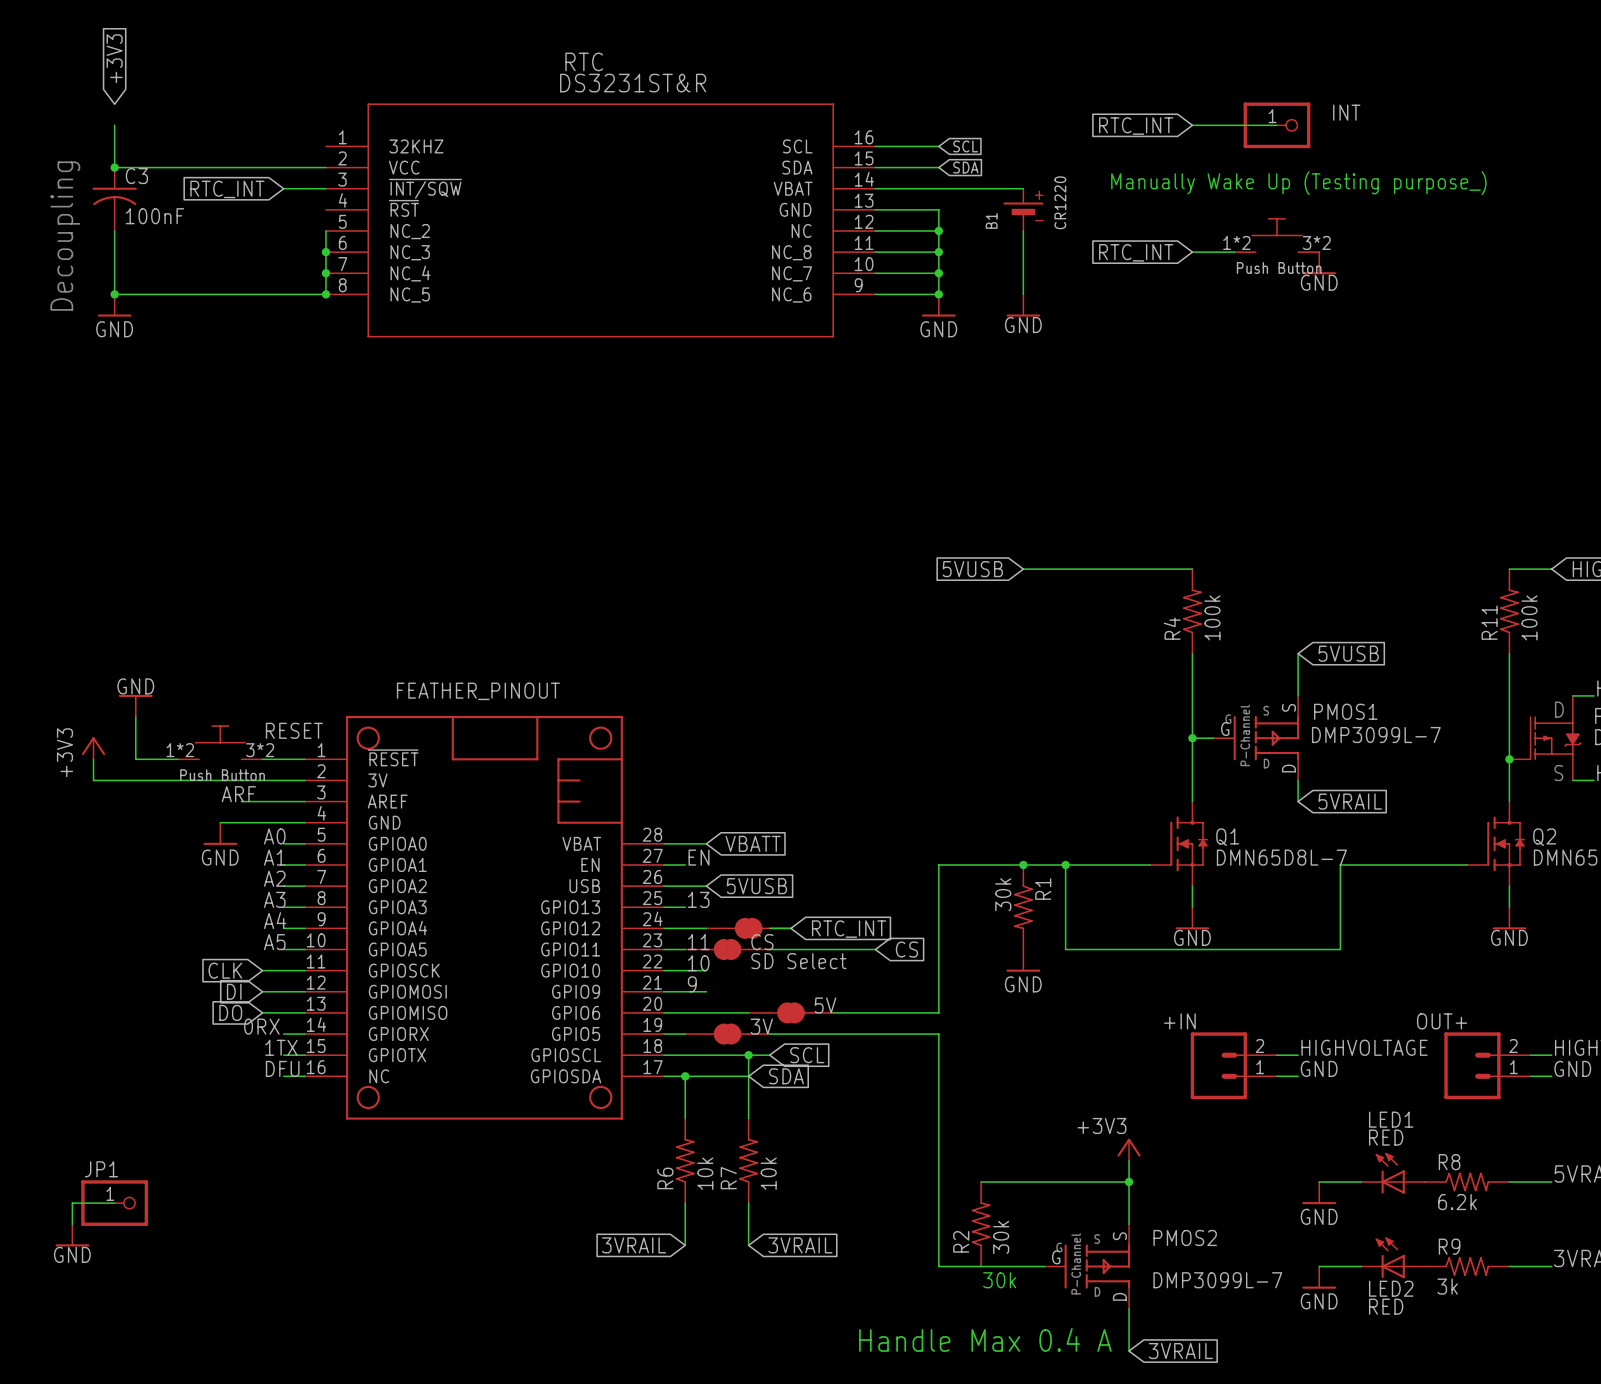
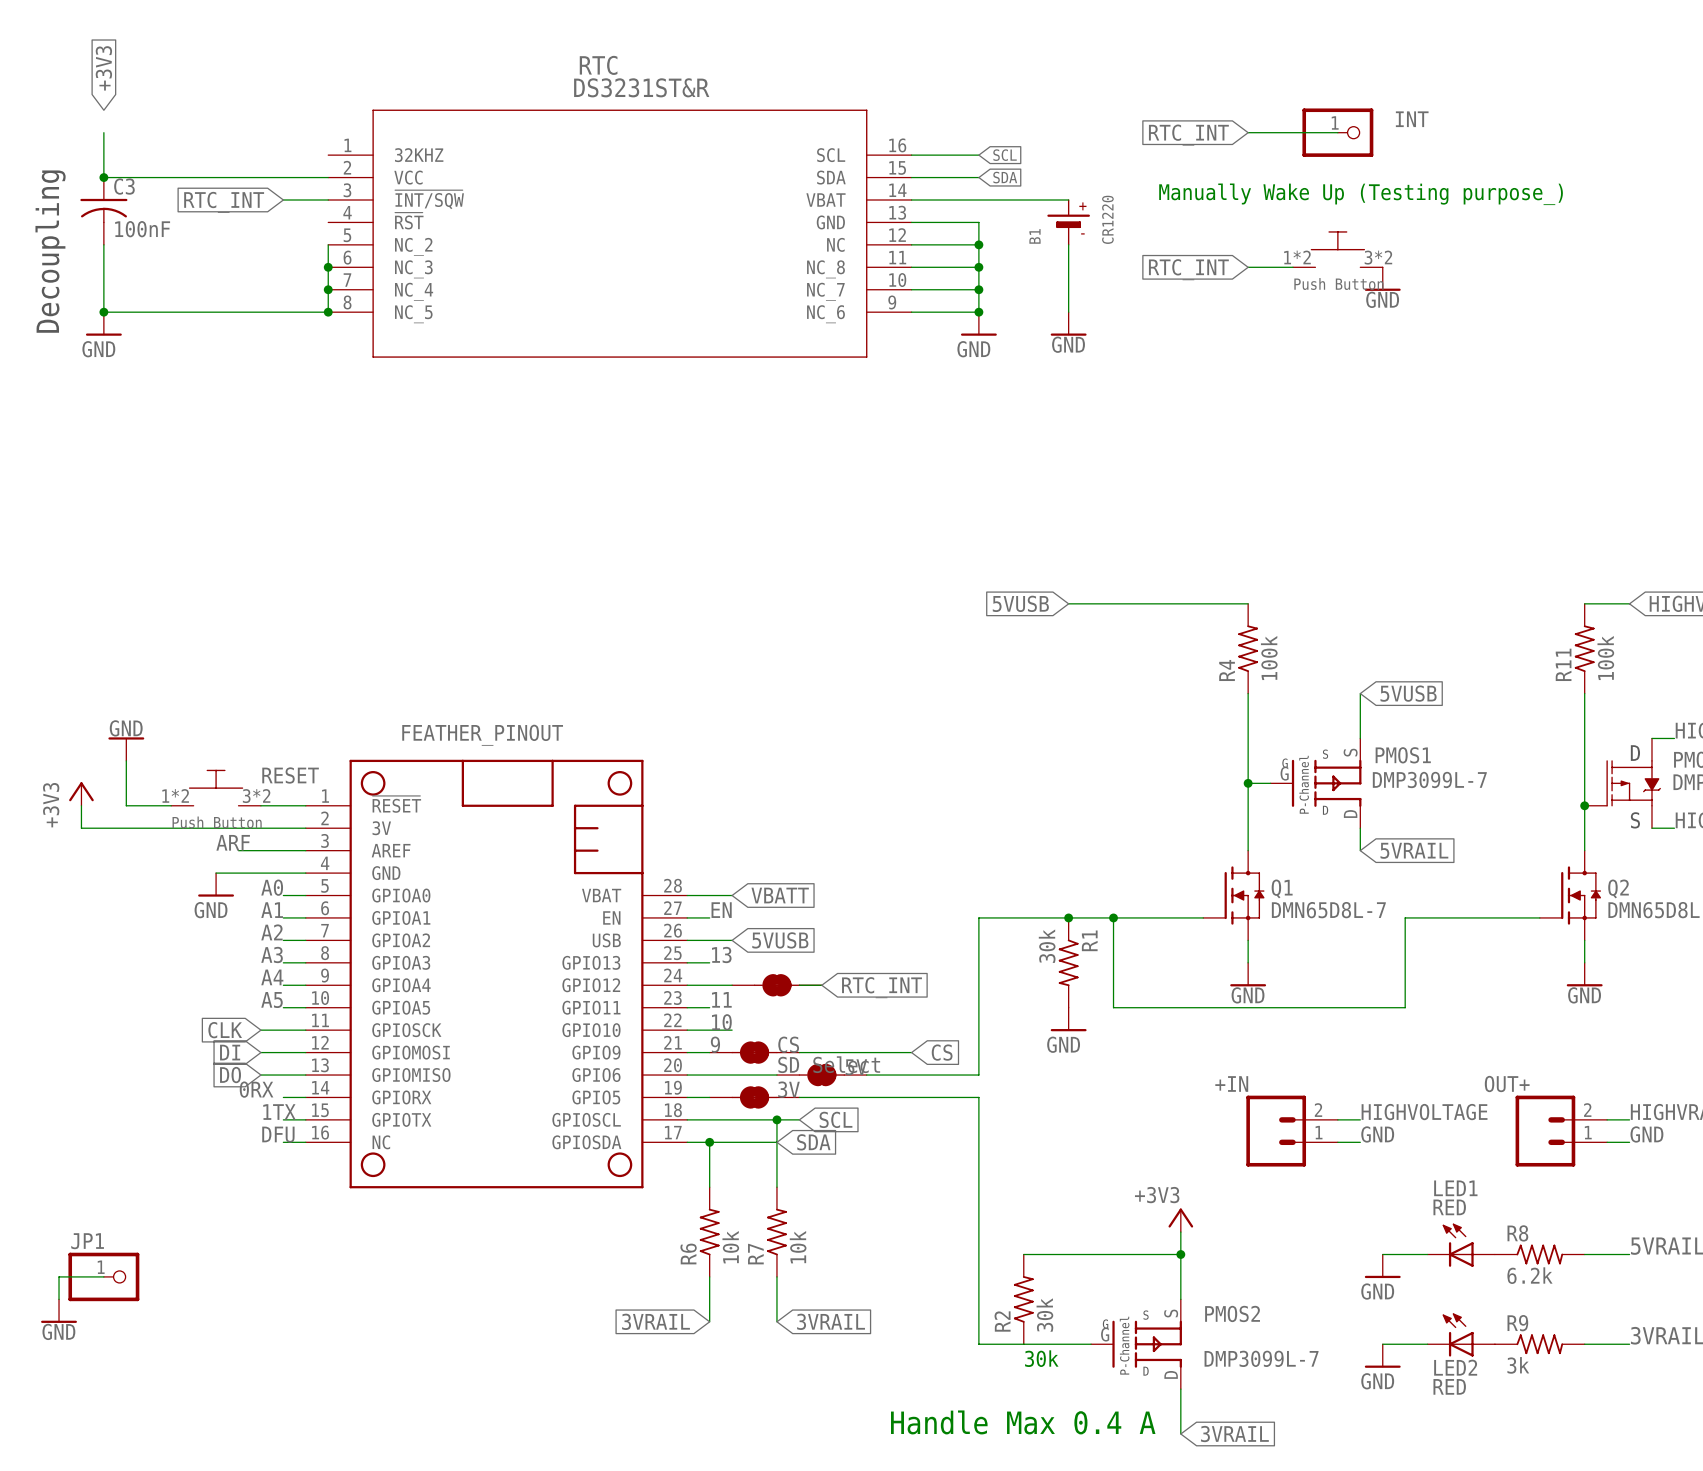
CS position: (727, 949) -> (754, 1052)
wire: (769, 949) (875, 949) -> (799, 1052) (911, 1052)
global label position: CS (906, 949) -> CS (942, 1052)

